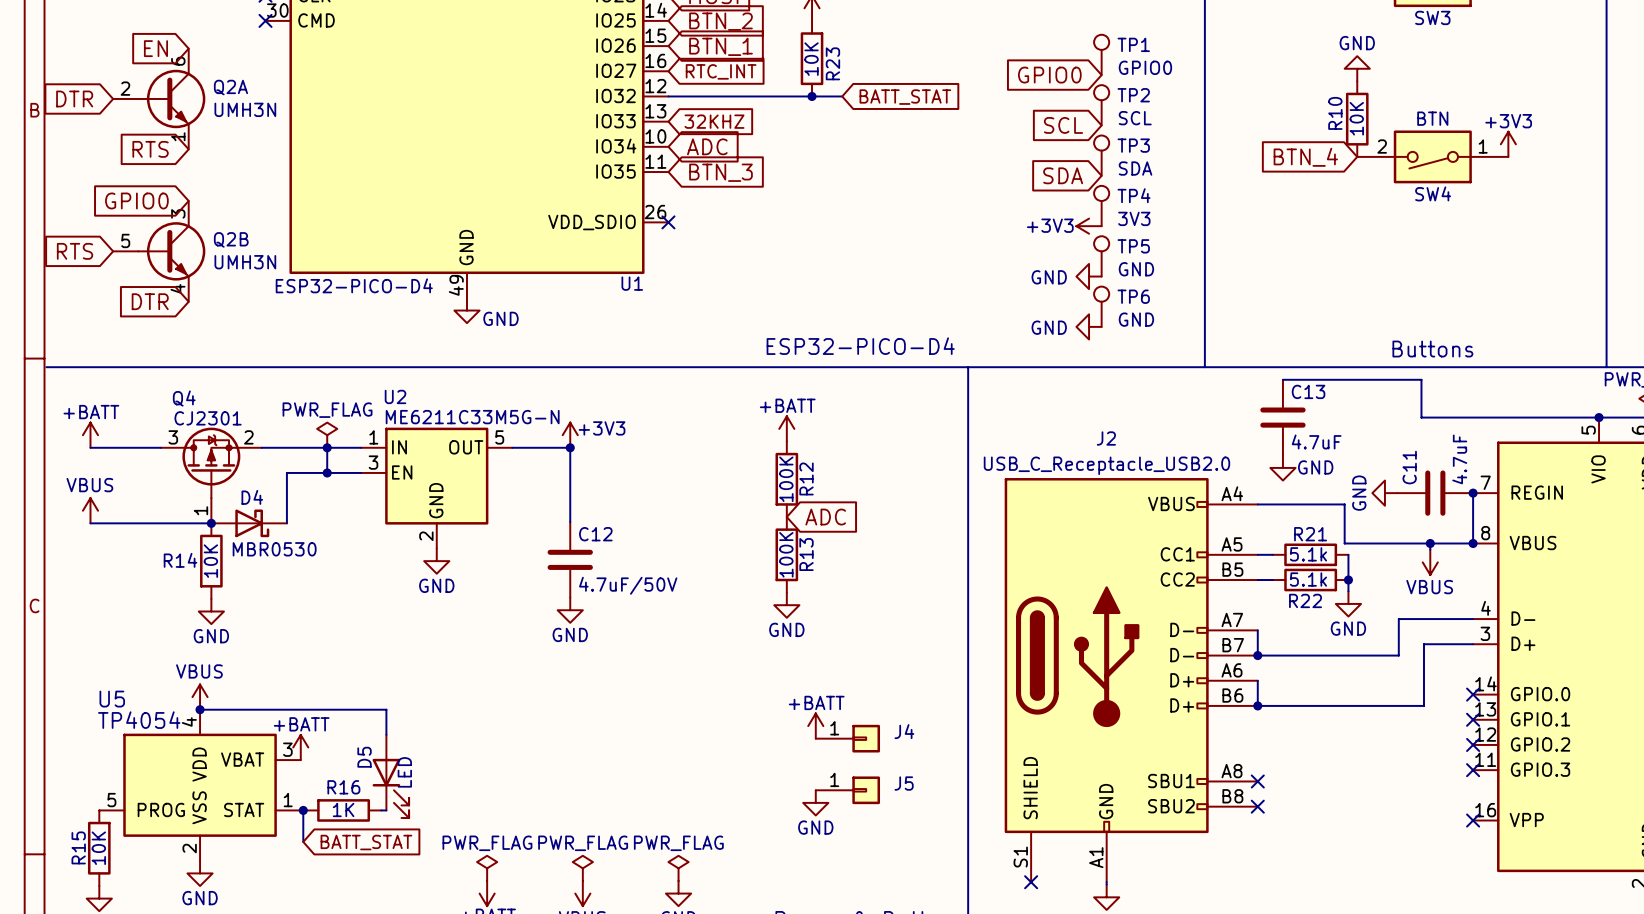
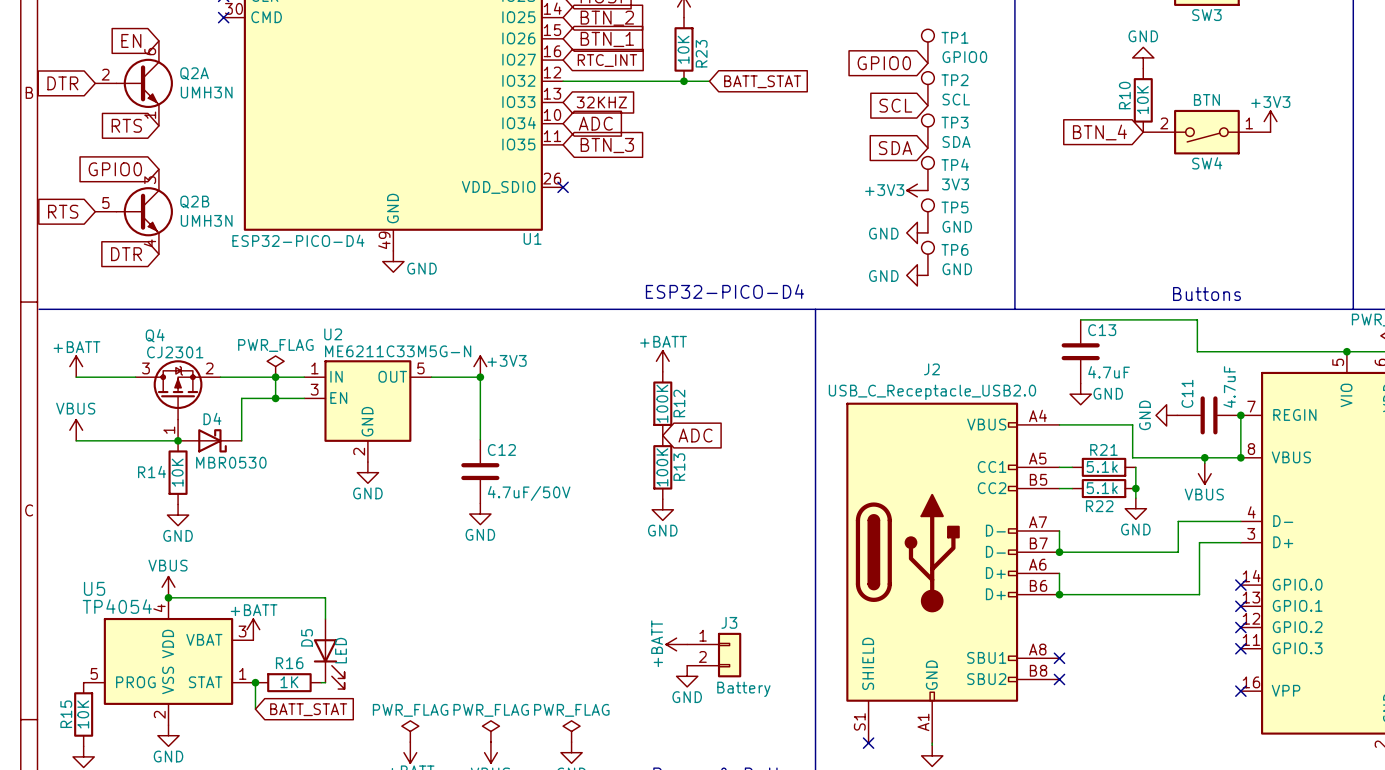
power symbol rotation: 0° (815, 726) -> 90° counterclockwise (676, 644)
power symbol position: +BATT (815, 726) -> +BATT (676, 644)
J4: (847, 738) -> none
J3: none -> Battery (714, 655)
J5: (847, 790) -> none

